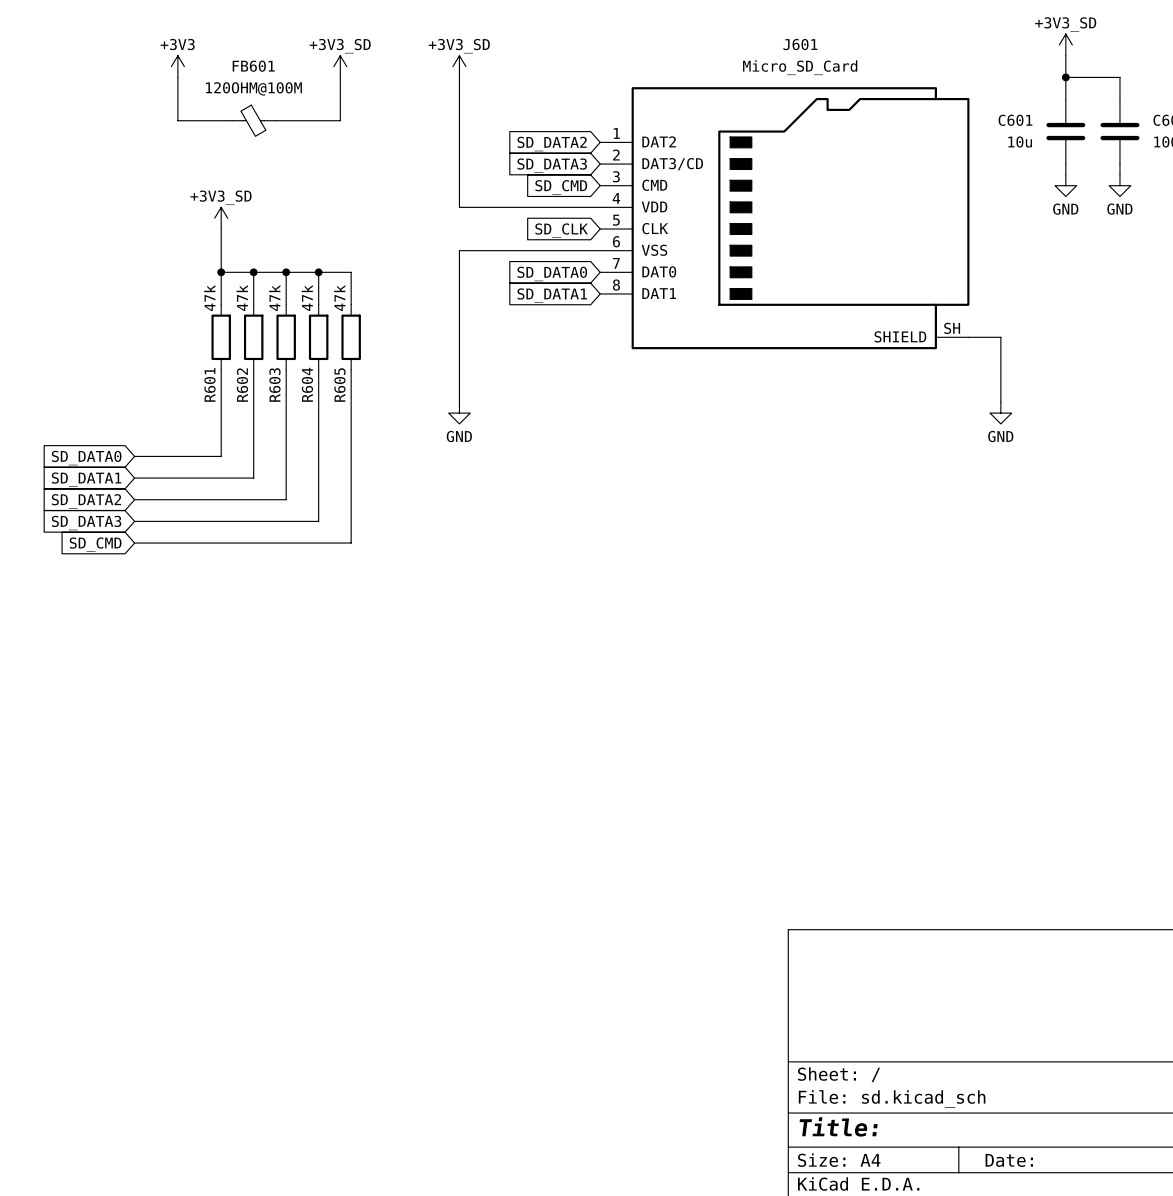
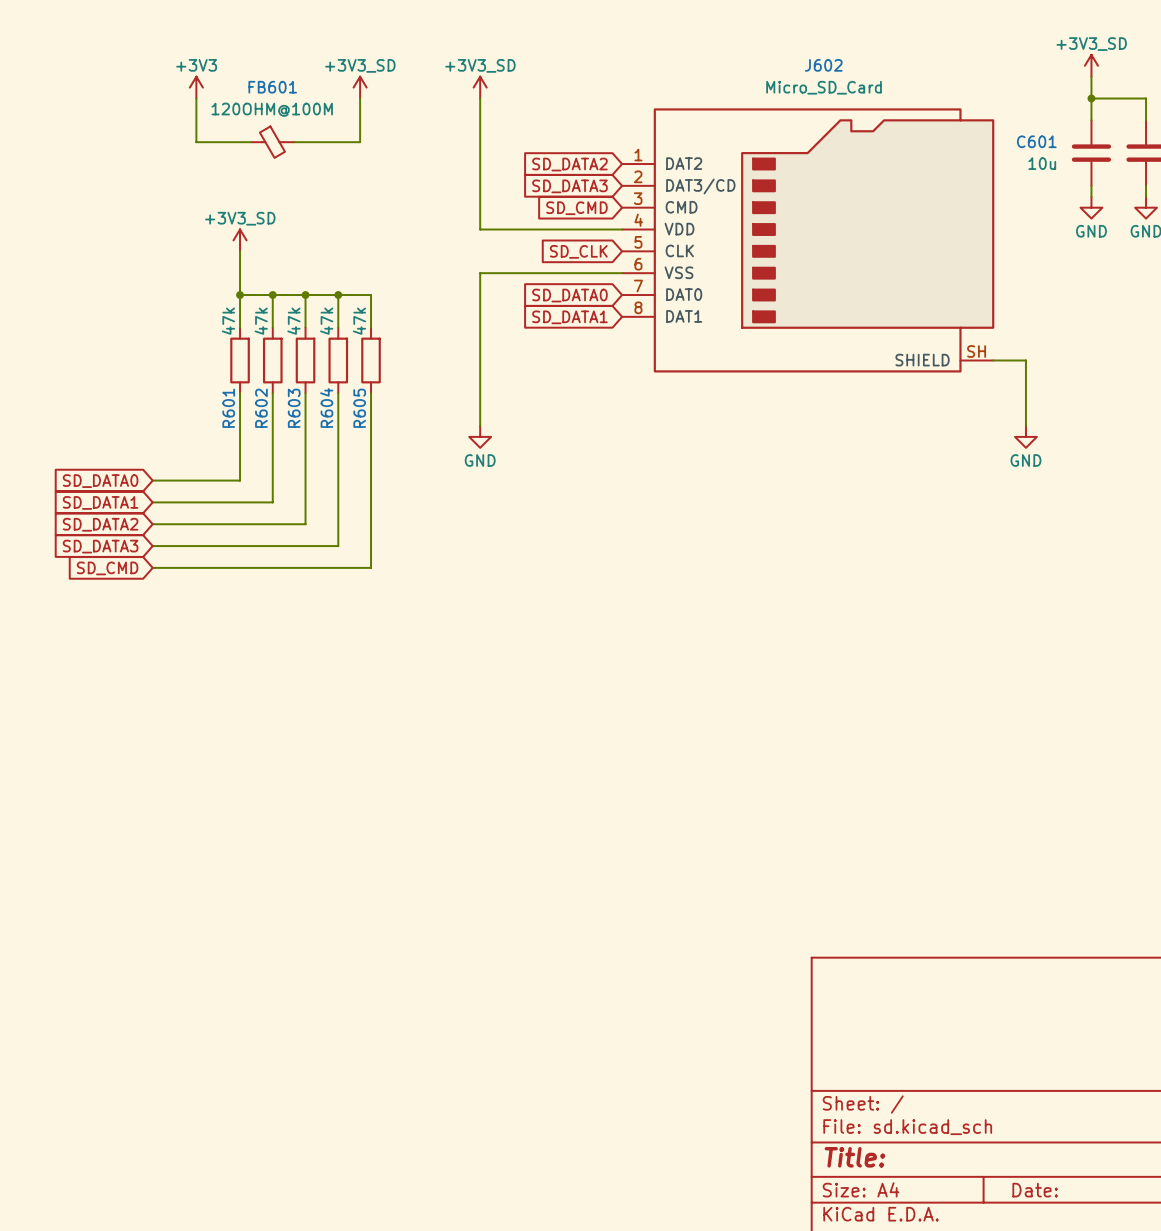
J601 name: J601 (800, 44) -> J602 (823, 65)

